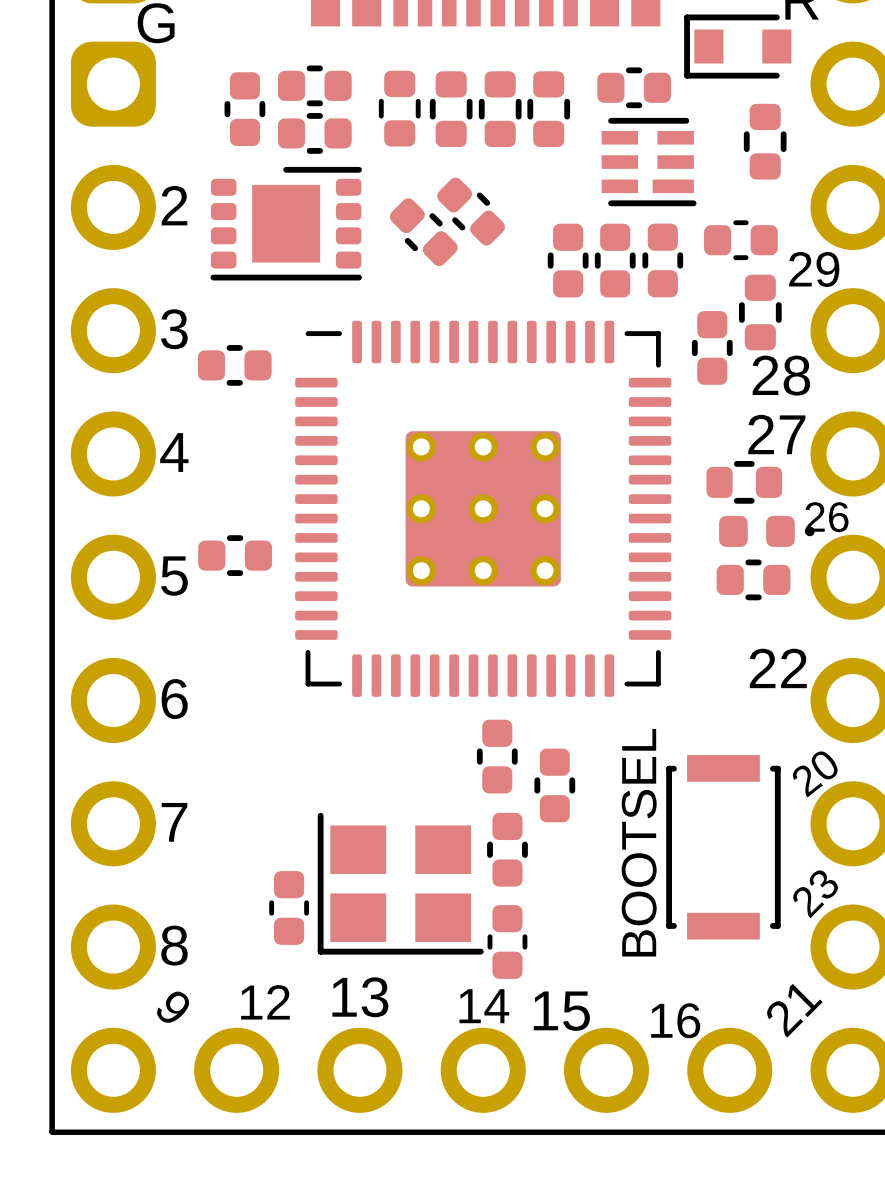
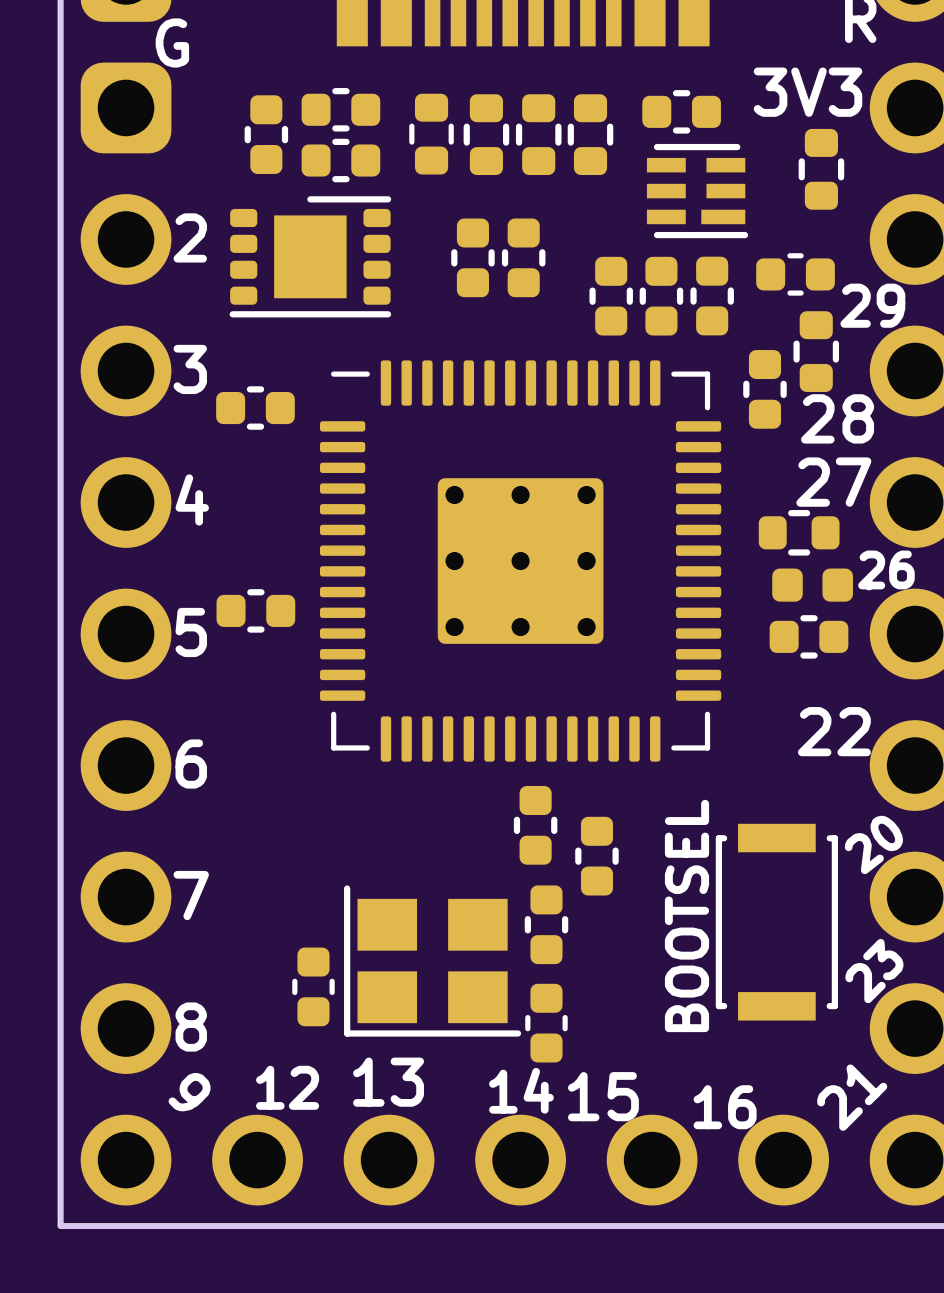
part: (737, 46) -> none
text: none -> 3V3 (808, 92)
part: (471, 211) -> none
part: none -> (523, 257)
part rotation: 0° (423, 232) -> 45° clockwise (472, 257)

